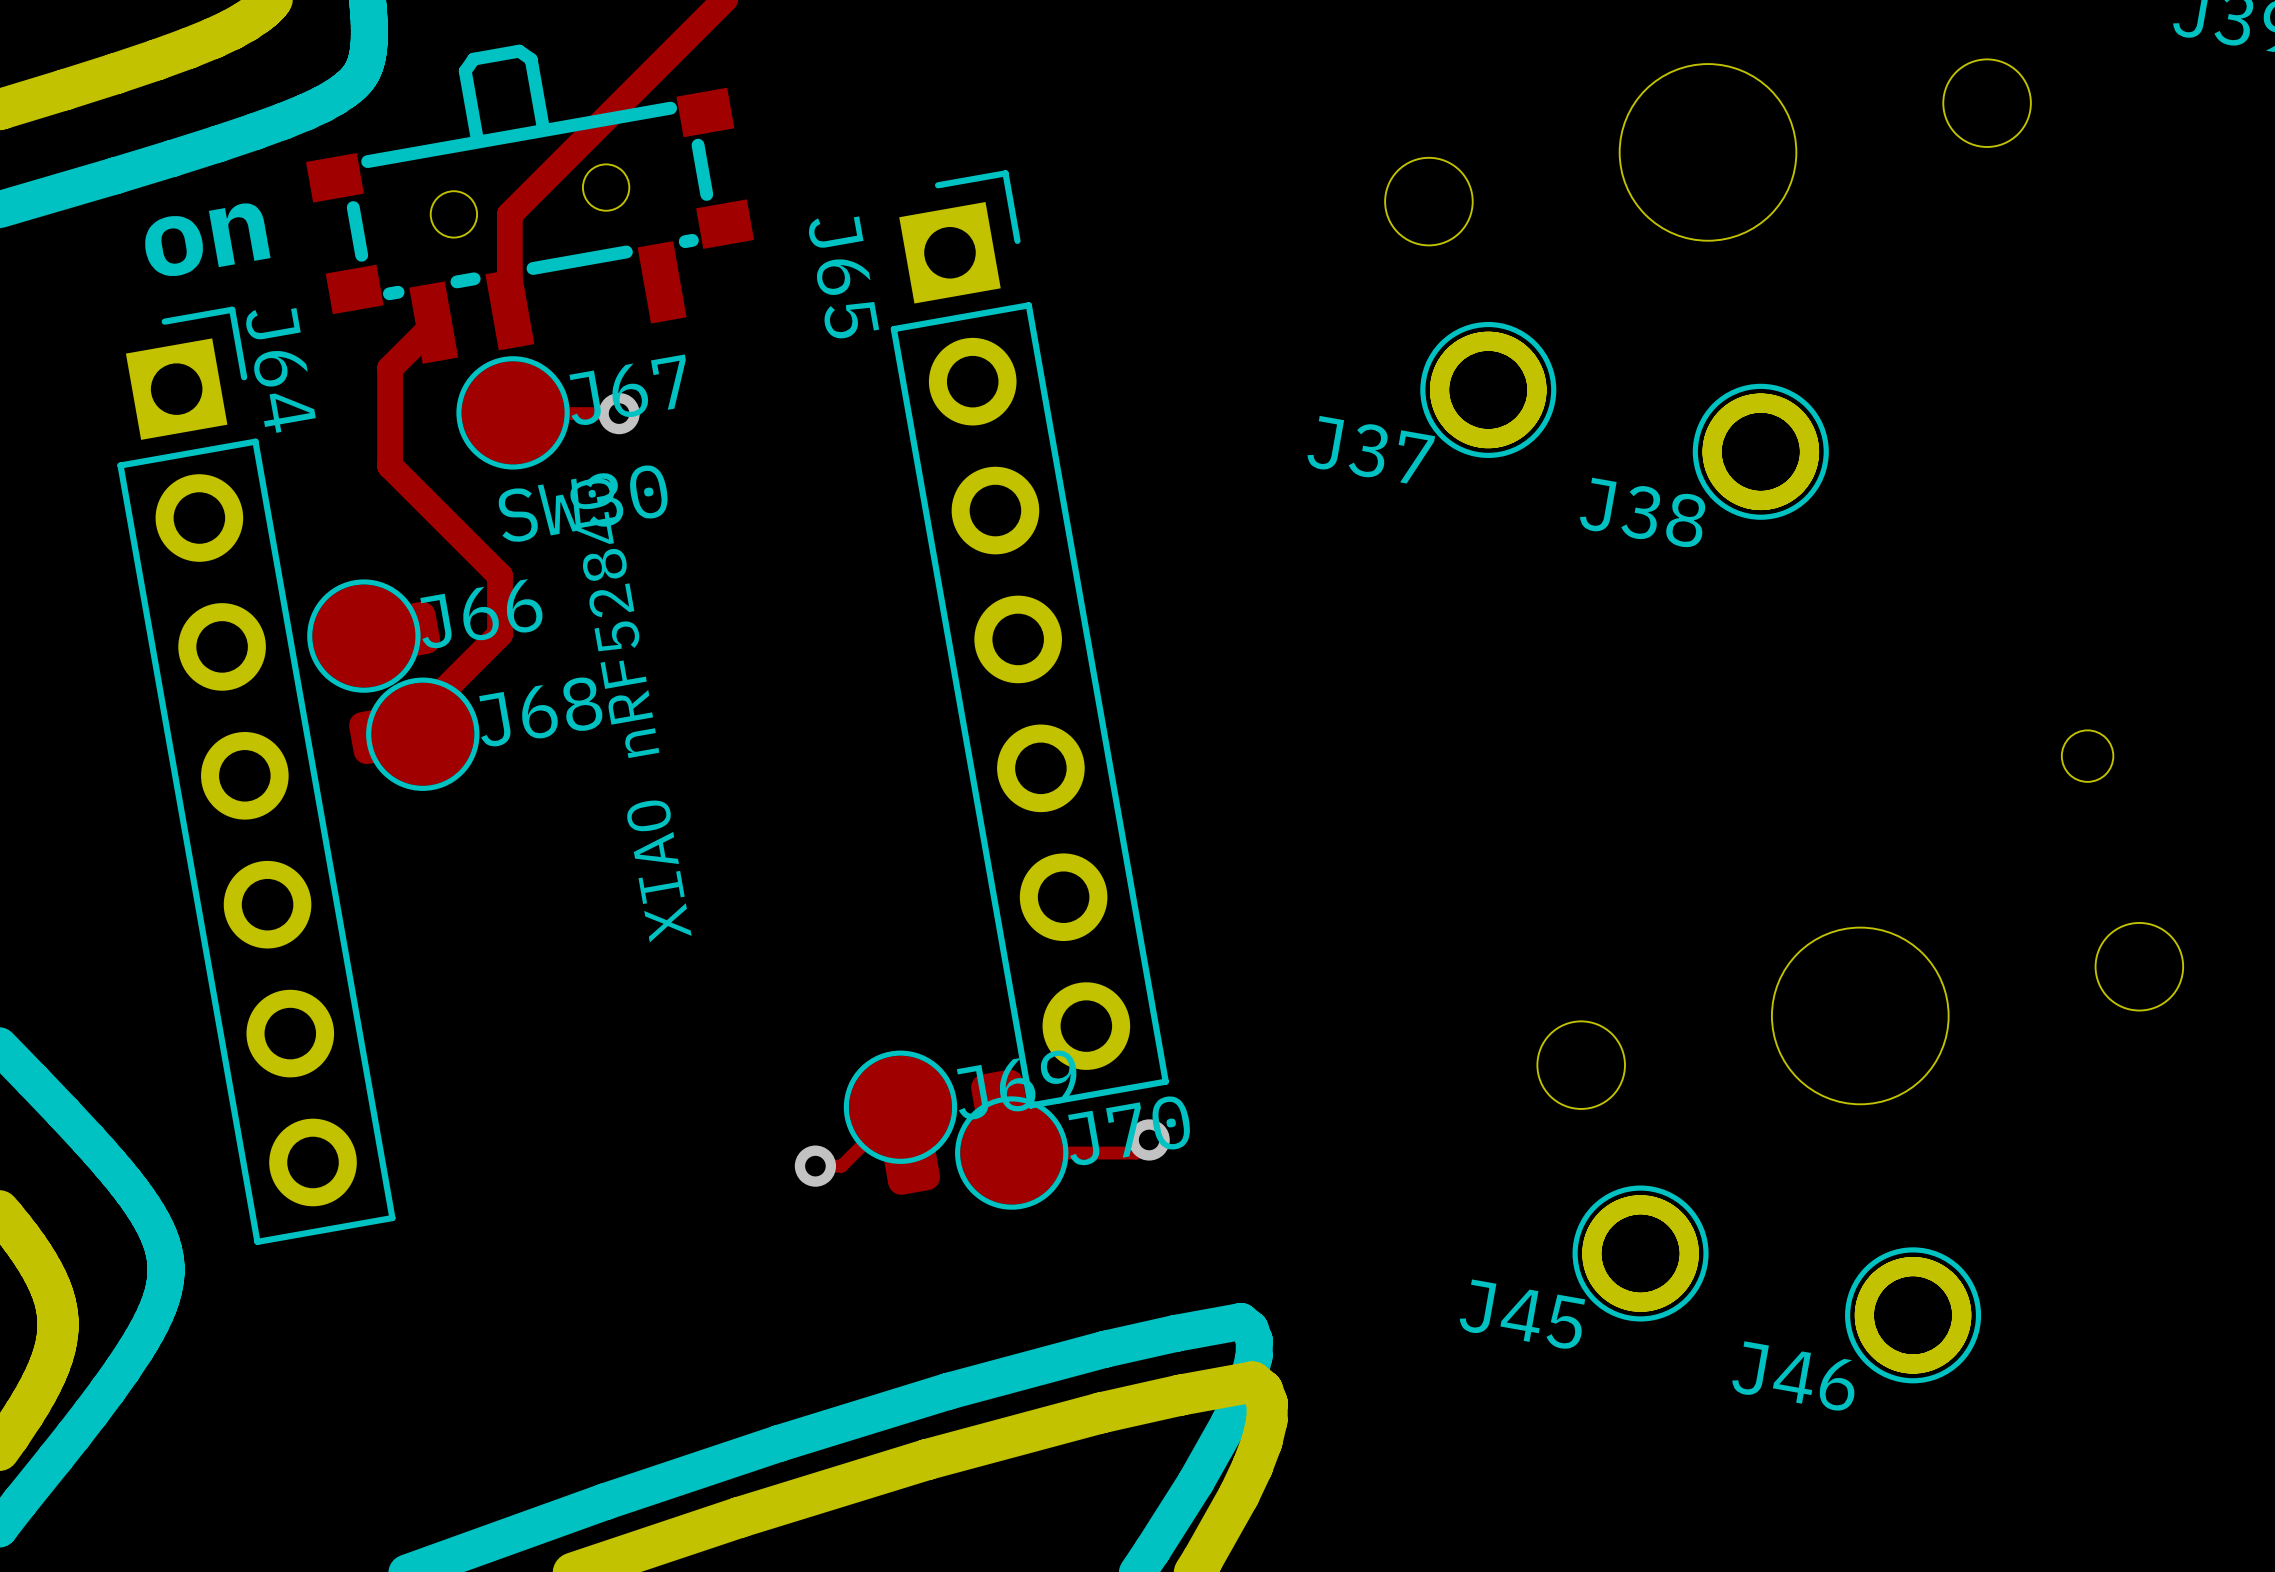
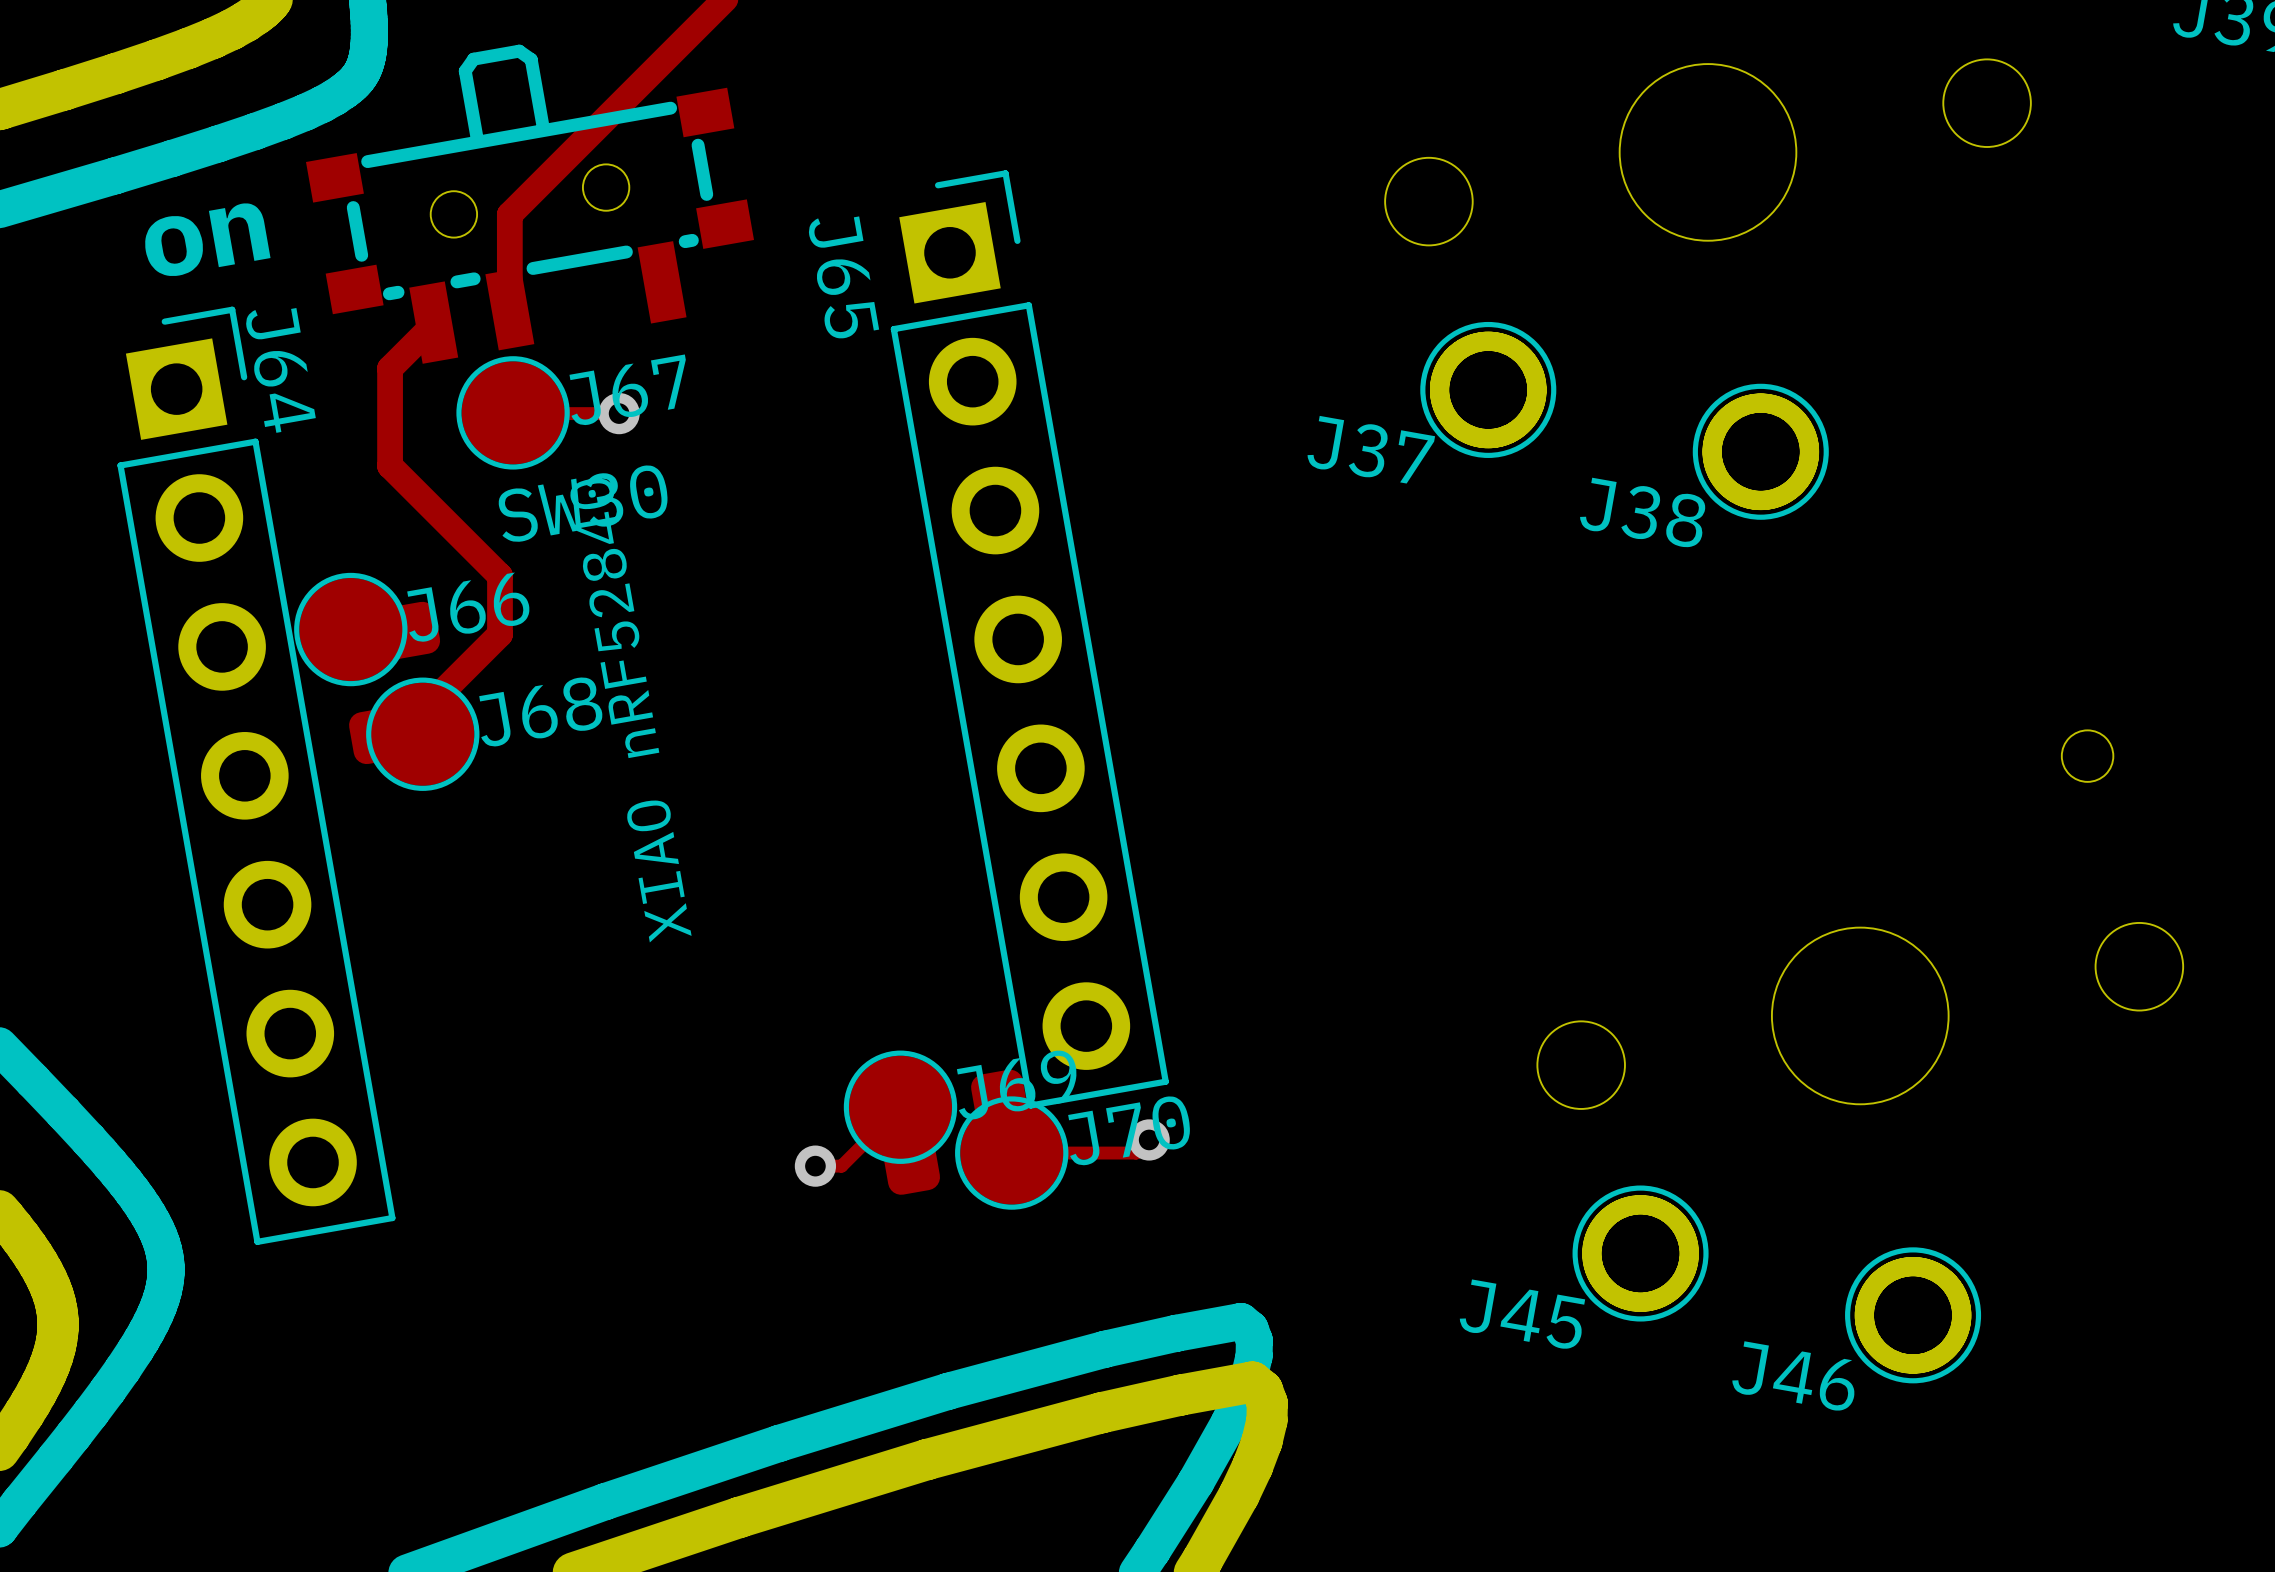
J66 position: (363, 636) -> (350, 629)

